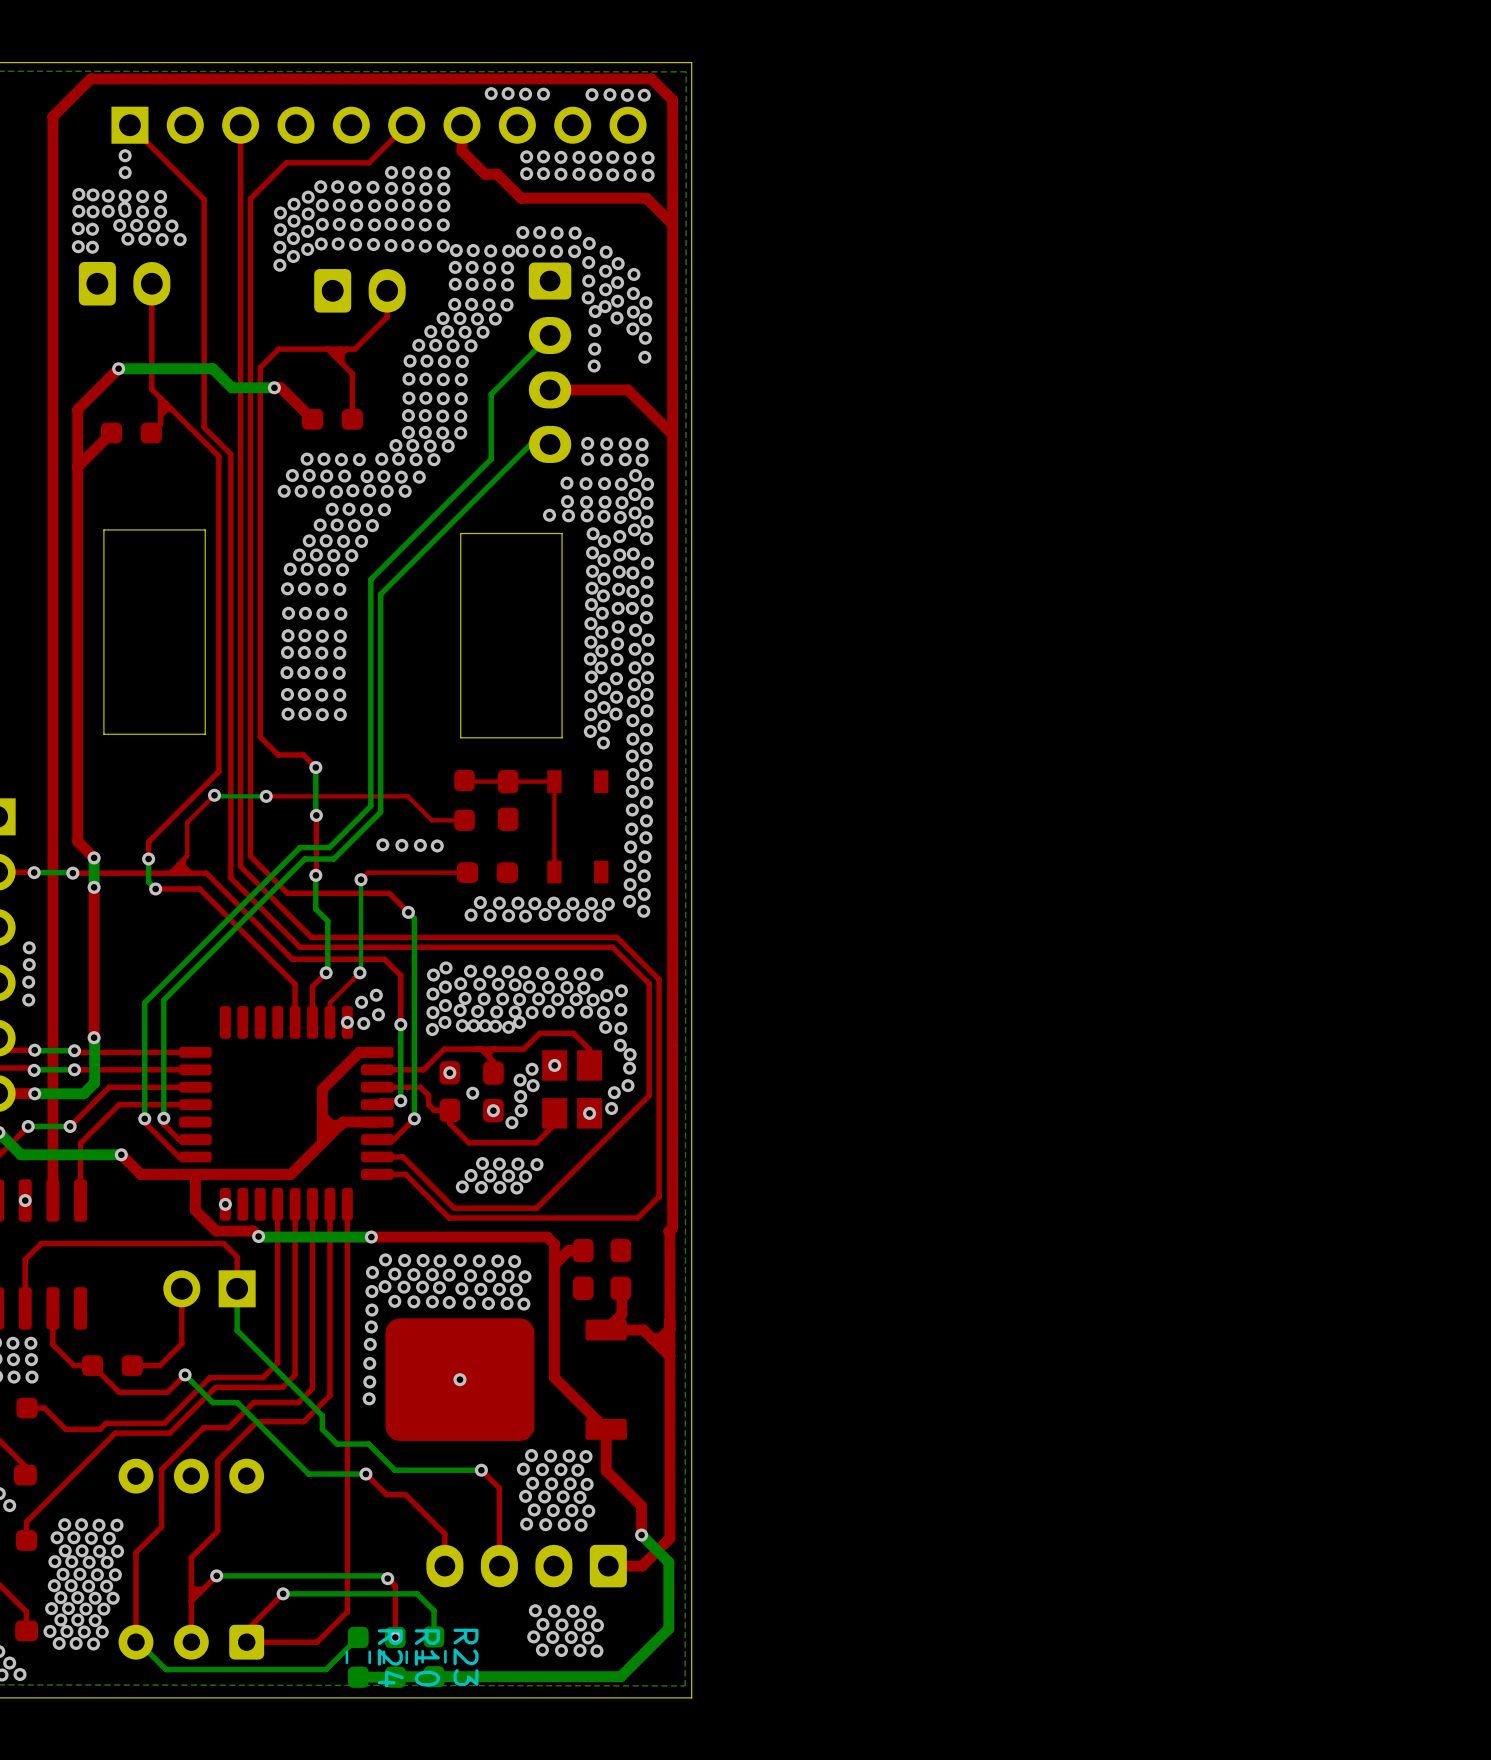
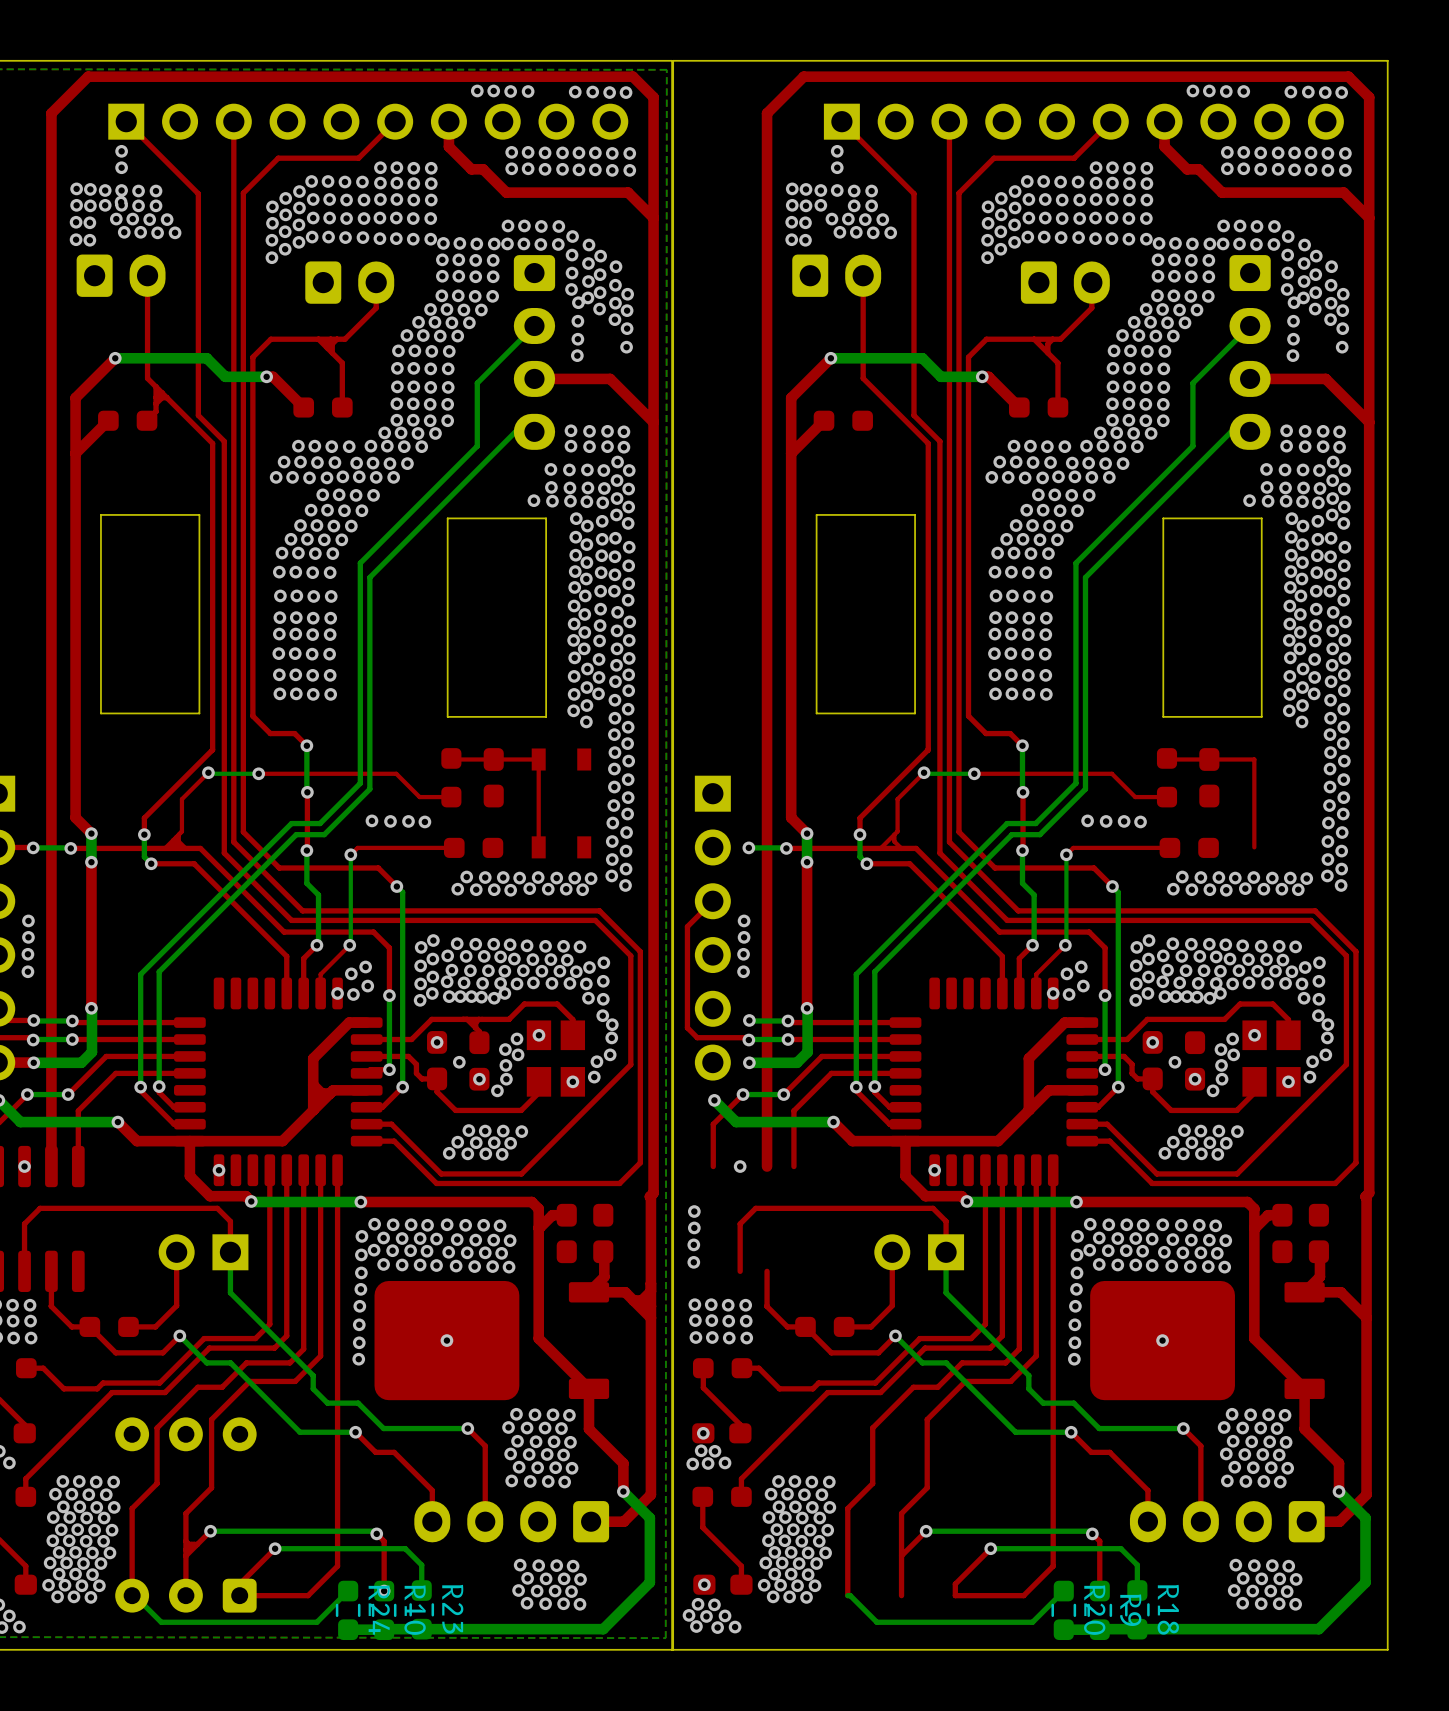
board edge: none -> (1387, 60) (673, 60) (673, 1649) (1387, 1649) (1387, 60)
via: none -> (1192, 90)
via: none -> (1209, 90)
via: none -> (1226, 91)
via: none -> (1243, 91)
via: none -> (1290, 92)
via: none -> (1308, 92)
via: none -> (1325, 92)
via: none -> (1341, 92)
top track: none -> (841, 121) (913, 193) (913, 415) (939, 441) (939, 853) (1007, 920) (1310, 920) (1346, 955) (1346, 1064) (1237, 1173) (1156, 1173) (1107, 1124) (1082, 1124)
top track: none -> (949, 121) (949, 842) (1018, 910) (1315, 910) (1355, 951) (1355, 1162) (1335, 1183) (1152, 1183) (1109, 1141) (1082, 1141)
part: none -> (1083, 121)
top track: none -> (1110, 121) (1074, 158) (993, 158) (958, 193) (958, 832) (994, 868) (1093, 868) (1112, 886)
top track: none -> (1164, 121) (1164, 146) (1187, 169) (1198, 169) (1222, 192) (1343, 192) (1369, 218)
via: none -> (837, 151)
via: none -> (1227, 152)
via: none -> (1243, 152)
via: none -> (1260, 152)
via: none -> (1278, 152)
via: none -> (1294, 152)
via: none -> (1310, 152)
via: none -> (1327, 153)
via: none -> (1345, 153)
via: none -> (837, 167)
via: none -> (1096, 167)
via: none -> (1112, 167)
via: none -> (1129, 168)
via: none -> (1146, 168)
via: none -> (1227, 168)
via: none -> (1243, 168)
via: none -> (1260, 169)
via: none -> (1278, 169)
via: none -> (1294, 169)
via: none -> (1310, 169)
via: none -> (1327, 170)
via: none -> (1345, 170)
via: none -> (1027, 181)
via: none -> (1043, 181)
via: none -> (1060, 182)
via: none -> (1078, 182)
via: none -> (1096, 183)
via: none -> (1112, 183)
via: none -> (1129, 183)
via: none -> (1146, 183)
via: none -> (792, 188)
via: none -> (806, 189)
via: none -> (820, 190)
via: none -> (837, 190)
via: none -> (854, 191)
via: none -> (871, 191)
via: none -> (1015, 191)
via: none -> (1001, 198)
via: none -> (1028, 199)
via: none -> (1045, 199)
via: none -> (1062, 200)
via: none -> (1079, 200)
via: none -> (1096, 199)
via: none -> (1112, 199)
via: none -> (1129, 200)
via: none -> (1146, 200)
via: none -> (792, 205)
via: none -> (806, 205)
via: none -> (820, 205)
via: none -> (854, 205)
via: none -> (871, 205)
via: none -> (988, 206)
via: none -> (1015, 207)
via: none -> (1001, 214)
via: none -> (1028, 218)
via: none -> (1045, 218)
via: none -> (1062, 218)
via: none -> (1079, 218)
via: none -> (1095, 218)
via: none -> (1111, 218)
via: none -> (1128, 218)
via: none -> (1146, 218)
via: none -> (831, 219)
via: none -> (848, 219)
via: none -> (865, 219)
via: none -> (882, 219)
via: none -> (791, 222)
via: none -> (805, 222)
via: none -> (988, 223)
via: none -> (1014, 224)
via: none -> (1223, 225)
via: none -> (1240, 225)
via: none -> (1256, 226)
via: none -> (1274, 226)
via: none -> (1000, 231)
via: none -> (839, 232)
via: none -> (856, 232)
via: none -> (873, 232)
via: none -> (890, 232)
via: none -> (1027, 237)
via: none -> (1044, 237)
via: none -> (1288, 236)
via: none -> (1061, 237)
via: none -> (1078, 237)
via: none -> (1095, 238)
via: none -> (1111, 238)
via: none -> (791, 239)
via: none -> (1128, 239)
via: none -> (1146, 239)
via: none -> (805, 240)
via: none -> (987, 240)
via: none -> (1014, 242)
via: none -> (1159, 243)
via: none -> (1175, 243)
via: none -> (1192, 243)
via: none -> (1209, 243)
via: none -> (1223, 243)
via: none -> (1239, 243)
via: none -> (1256, 244)
via: none -> (1273, 244)
via: none -> (1304, 245)
via: none -> (1000, 249)
via: none -> (1287, 255)
via: none -> (1316, 256)
via: none -> (987, 257)
via: none -> (1158, 259)
via: none -> (1174, 259)
via: none -> (1191, 260)
via: none -> (1208, 260)
via: none -> (1304, 263)
via: none -> (1331, 266)
via: none -> (1287, 273)
via: none -> (1315, 274)
part: none -> (836, 275)
top track: none -> (863, 275) (863, 378) (928, 443) (928, 749) (860, 818) (860, 834)
via: none -> (1158, 276)
via: none -> (1174, 276)
via: none -> (1191, 276)
via: none -> (1208, 276)
via: none -> (1304, 281)
part: none -> (1065, 282)
top track: none -> (1091, 282) (1091, 308) (1060, 339) (986, 339) (968, 357) (968, 716) (985, 733) (1010, 733) (1022, 745)
via: none -> (1331, 285)
via: none -> (1287, 289)
via: none -> (1315, 292)
via: none -> (1343, 294)
via: none -> (1157, 295)
via: none -> (1173, 295)
via: none -> (1190, 296)
via: none -> (1208, 296)
via: none -> (1303, 297)
via: none -> (1294, 302)
via: none -> (1331, 303)
via: none -> (1146, 309)
via: none -> (1162, 309)
via: none -> (1315, 309)
via: none -> (1179, 310)
via: none -> (1197, 310)
via: none -> (1342, 310)
via: none -> (1330, 319)
via: none -> (1293, 321)
via: none -> (1134, 322)
via: none -> (1150, 322)
via: none -> (1167, 322)
via: none -> (1185, 322)
bottom track: none -> (1250, 325) (1192, 383) (1192, 446) (1075, 563) (1075, 783) (1035, 823) (1007, 823) (856, 974) (856, 1087)
via: none -> (1342, 328)
via: none -> (1122, 335)
via: none -> (1138, 335)
via: none -> (1155, 336)
via: none -> (1173, 336)
top track: none -> (1034, 339) (1057, 363) (1057, 407)
top track: none -> (1052, 339) (1047, 343) (1047, 352)
via: none -> (1293, 339)
via: none -> (1342, 347)
via: none -> (1114, 350)
via: none -> (1130, 350)
via: none -> (1147, 351)
via: none -> (1164, 351)
part: none -> (1250, 352)
via: none -> (1292, 355)
top track: none -> (830, 358) (791, 397) (791, 817) (807, 833)
bottom track: none -> (830, 358) (922, 358) (940, 376) (982, 376)
via: none -> (830, 358)
via: none -> (1113, 368)
via: none -> (1129, 368)
via: none -> (1146, 368)
via: none -> (1163, 368)
top track: none -> (982, 376) (988, 376) (1019, 407)
via: none -> (982, 376)
top track: none -> (1250, 378) (1325, 378) (1369, 422)
via: none -> (1113, 386)
via: none -> (1129, 386)
via: none -> (1146, 387)
via: none -> (1163, 387)
via: none -> (1112, 403)
via: none -> (1128, 403)
via: none -> (1145, 404)
via: none -> (1163, 404)
part: none -> (1038, 407)
via: none -> (1112, 420)
via: none -> (1128, 420)
top track: none -> (824, 420) (791, 453)
part: none -> (843, 420)
via: none -> (1145, 420)
via: none -> (1163, 420)
via: none -> (1286, 430)
via: none -> (1305, 431)
via: none -> (1323, 431)
bottom track: none -> (1250, 431) (1231, 431) (1085, 577) (1085, 789) (1039, 834) (1011, 834) (874, 971) (874, 1086)
via: none -> (1339, 431)
via: none -> (1100, 432)
via: none -> (1116, 432)
via: none -> (1133, 433)
via: none -> (1151, 433)
via: none -> (1014, 446)
via: none -> (1030, 446)
via: none -> (1047, 446)
via: none -> (1064, 446)
via: none -> (1086, 446)
via: none -> (1102, 446)
via: none -> (1119, 446)
via: none -> (1137, 446)
via: none -> (1286, 446)
via: none -> (1305, 446)
via: none -> (1323, 446)
via: none -> (1339, 447)
via: none -> (999, 462)
via: none -> (1016, 462)
via: none -> (1333, 462)
via: none -> (1033, 462)
via: none -> (1050, 462)
via: none -> (1072, 463)
via: none -> (1088, 463)
via: none -> (1105, 463)
via: none -> (1123, 463)
via: none -> (1266, 469)
via: none -> (1285, 469)
via: none -> (1303, 469)
via: none -> (1319, 470)
via: none -> (1344, 470)
via: none -> (1058, 476)
via: none -> (1074, 476)
via: none -> (991, 477)
via: none -> (1008, 477)
via: none -> (1025, 477)
via: none -> (1042, 477)
via: none -> (1091, 477)
via: none -> (1109, 477)
via: none -> (1332, 480)
via: none -> (1267, 487)
via: none -> (1285, 487)
via: none -> (1303, 487)
via: none -> (1319, 488)
via: none -> (1344, 489)
via: none -> (1038, 494)
via: none -> (1054, 494)
via: none -> (1071, 495)
via: none -> (1089, 495)
via: none -> (1332, 498)
via: none -> (1249, 500)
via: none -> (1268, 501)
via: none -> (1286, 501)
via: none -> (1302, 501)
via: none -> (1318, 502)
via: none -> (1344, 507)
via: none -> (1026, 510)
via: none -> (1043, 510)
via: none -> (1060, 510)
via: none -> (1077, 510)
board edge: none -> (915, 514) (816, 514) (816, 713) (915, 713) (915, 514)
via: none -> (1332, 514)
board edge: none -> (1261, 518) (1163, 518) (1163, 716) (1261, 716) (1261, 518)
via: none -> (1291, 518)
via: none -> (1317, 521)
via: none -> (1343, 523)
via: none -> (1016, 525)
via: none -> (1032, 525)
via: none -> (1049, 526)
via: none -> (1066, 526)
via: none -> (1303, 526)
via: none -> (1291, 537)
via: none -> (1331, 538)
via: none -> (1006, 539)
via: none -> (1023, 539)
via: none -> (1039, 539)
via: none -> (1057, 539)
via: none -> (1317, 539)
via: none -> (1302, 544)
via: none -> (1344, 547)
via: none -> (997, 553)
via: none -> (1014, 553)
via: none -> (1030, 553)
via: none -> (1048, 553)
via: none -> (1291, 555)
via: none -> (1317, 555)
via: none -> (1330, 556)
via: none -> (1302, 562)
via: none -> (1344, 565)
via: none -> (994, 572)
via: none -> (1011, 572)
via: none -> (1290, 571)
via: none -> (1028, 572)
via: none -> (1045, 572)
via: none -> (1316, 572)
via: none -> (1330, 574)
via: none -> (1301, 579)
via: none -> (1344, 583)
via: none -> (1290, 587)
via: none -> (1316, 591)
via: none -> (1330, 591)
via: none -> (996, 595)
via: none -> (1012, 595)
via: none -> (1029, 596)
via: none -> (1046, 596)
via: none -> (1300, 595)
via: none -> (1343, 600)
via: none -> (1289, 606)
via: none -> (1316, 609)
via: none -> (1333, 612)
via: none -> (1300, 614)
via: none -> (995, 617)
via: none -> (1011, 617)
via: none -> (1028, 618)
via: none -> (1046, 618)
via: none -> (1345, 621)
via: none -> (1289, 623)
via: none -> (1315, 625)
via: none -> (1332, 630)
via: none -> (1300, 632)
via: none -> (994, 634)
via: none -> (1011, 634)
via: none -> (1028, 634)
via: none -> (1045, 634)
via: none -> (1289, 640)
via: none -> (1315, 640)
via: none -> (1344, 640)
via: none -> (1299, 648)
via: none -> (1332, 648)
via: none -> (994, 653)
via: none -> (1010, 653)
via: none -> (1027, 654)
via: none -> (1045, 654)
via: none -> (1290, 657)
via: none -> (1344, 658)
via: none -> (1314, 659)
via: none -> (1332, 665)
via: none -> (1303, 669)
via: none -> (994, 674)
via: none -> (1011, 674)
via: none -> (1344, 674)
via: none -> (1028, 675)
via: none -> (1045, 675)
via: none -> (1289, 676)
via: none -> (1314, 677)
via: none -> (1331, 681)
via: none -> (1302, 687)
via: none -> (1344, 690)
via: none -> (995, 693)
via: none -> (1011, 693)
via: none -> (1028, 694)
via: none -> (1046, 694)
via: none -> (1289, 694)
via: none -> (1314, 693)
via: none -> (1330, 700)
via: none -> (1302, 705)
via: none -> (1343, 709)
via: none -> (1289, 710)
via: none -> (1330, 718)
via: none -> (1302, 721)
via: none -> (1343, 727)
via: none -> (1330, 734)
via: none -> (1343, 743)
bottom track: none -> (1022, 745) (1023, 792)
via: none -> (1022, 745)
via: none -> (1330, 752)
top track: none -> (1167, 758) (1254, 759) (1254, 847)
via: none -> (1344, 761)
via: none -> (1330, 769)
top track: none -> (924, 772) (897, 799) (897, 831) (880, 848)
bottom track: none -> (924, 772) (974, 773)
via: none -> (924, 772)
top track: none -> (974, 773) (1111, 773) (1135, 797) (1167, 797)
via: none -> (974, 773)
part: none -> (1167, 777)
part: none -> (1209, 777)
via: none -> (1343, 779)
via: none -> (1330, 787)
top track: none -> (1023, 792) (1022, 850)
via: none -> (1023, 792)
via: none -> (1343, 797)
via: none -> (1329, 805)
via: none -> (1343, 814)
via: none -> (1087, 820)
via: none -> (1106, 821)
via: none -> (1124, 821)
via: none -> (1140, 821)
via: none -> (1328, 823)
via: none -> (1342, 832)
bottom track: none -> (807, 833) (807, 862)
via: none -> (807, 833)
bottom track: none -> (860, 834) (860, 856) (866, 863)
via: none -> (860, 834)
top track: none -> (894, 834) (894, 841) (901, 848)
via: none -> (1327, 841)
bottom track: none -> (748, 847) (786, 848)
via: none -> (748, 847)
top track: none -> (1169, 847) (1073, 847) (1066, 854)
part: none -> (1189, 847)
top track: none -> (786, 848) (916, 848) (999, 932) (1089, 932) (1105, 947) (1105, 995)
via: none -> (786, 848)
bottom track: none -> (1022, 850) (1022, 883) (1034, 895) (1034, 943) (1032, 945)
via: none -> (1022, 850)
via: none -> (1341, 851)
bottom track: none -> (1066, 854) (1065, 945)
via: none -> (1066, 854)
via: none -> (1327, 859)
top track: none -> (807, 862) (807, 1008)
via: none -> (807, 862)
top track: none -> (866, 863) (909, 863) (1002, 956) (1002, 993)
via: none -> (866, 863)
via: none -> (1341, 869)
via: none -> (1327, 875)
via: none -> (1182, 877)
via: none -> (1200, 877)
via: none -> (1218, 877)
via: none -> (1235, 878)
via: none -> (1253, 877)
via: none -> (1272, 878)
via: none -> (1290, 878)
via: none -> (1306, 878)
via: none -> (1341, 885)
bottom track: none -> (1112, 886) (1118, 892) (1118, 1087)
via: none -> (1112, 886)
via: none -> (1245, 888)
via: none -> (1173, 889)
via: none -> (1191, 889)
via: none -> (1209, 889)
via: none -> (1263, 889)
via: none -> (1281, 889)
via: none -> (1298, 889)
via: none -> (1226, 890)
top track: none -> (712, 901) (687, 926) (687, 1027) (697, 1037) (746, 1037) (748, 1040)
via: none -> (744, 920)
part: none -> (712, 928)
via: none -> (744, 937)
via: none -> (1149, 940)
via: none -> (1172, 943)
via: none -> (1191, 944)
via: none -> (1209, 944)
top track: none -> (1032, 945) (1019, 958) (1019, 993)
via: none -> (1032, 945)
top track: none -> (1065, 945) (1036, 974) (1036, 993)
via: none -> (1065, 945)
via: none -> (1225, 944)
via: none -> (1242, 945)
via: none -> (1261, 946)
via: none -> (1279, 946)
via: none -> (1295, 946)
via: none -> (1136, 947)
via: none -> (743, 954)
via: none -> (1163, 955)
via: none -> (1181, 956)
via: none -> (1199, 956)
via: none -> (1216, 956)
via: none -> (1148, 959)
via: none -> (1229, 959)
via: none -> (1248, 959)
via: none -> (1266, 959)
via: none -> (1282, 960)
via: none -> (1319, 962)
via: none -> (1136, 965)
via: none -> (1081, 966)
via: none -> (1305, 967)
via: none -> (1167, 970)
via: none -> (1186, 970)
via: none -> (1204, 970)
via: none -> (1220, 971)
via: none -> (1238, 970)
via: none -> (1257, 971)
via: none -> (1275, 971)
via: none -> (743, 971)
via: none -> (1291, 971)
via: none -> (1066, 973)
via: none -> (1148, 977)
via: none -> (1318, 981)
via: none -> (1162, 981)
via: none -> (1179, 982)
via: none -> (1249, 982)
via: none -> (1136, 983)
via: none -> (1198, 983)
via: none -> (1216, 983)
via: none -> (1232, 983)
via: none -> (1267, 983)
via: none -> (1285, 983)
via: none -> (1301, 983)
via: none -> (1083, 986)
via: none -> (1053, 993)
via: none -> (1147, 993)
via: none -> (1220, 993)
via: none -> (1069, 994)
bottom track: none -> (1105, 995) (1105, 1069)
via: none -> (1105, 995)
via: none -> (1164, 996)
via: none -> (1176, 996)
via: none -> (1187, 996)
via: none -> (1197, 997)
via: none -> (1209, 998)
via: none -> (1304, 998)
via: none -> (1318, 999)
via: none -> (1135, 1000)
bottom track: none -> (807, 1008) (807, 1052) (797, 1062) (749, 1062)
via: none -> (807, 1008)
via: none -> (1318, 1015)
bottom track: none -> (749, 1020) (788, 1020)
via: none -> (749, 1020)
top track: none -> (788, 1020) (789, 1022) (905, 1022)
via: none -> (788, 1020)
top track: none -> (1082, 1022) (1064, 1022) (1028, 1058) (1029, 1109)
via: none -> (1327, 1024)
via: none -> (1254, 1035)
top track: none -> (1288, 1035) (1288, 1019) (1272, 1004) (1240, 1004) (1224, 1019) (1147, 1019) (1127, 1039) (1082, 1039)
via: none -> (1327, 1037)
bottom track: none -> (788, 1039) (748, 1040)
via: none -> (788, 1039)
top track: none -> (905, 1039) (788, 1039)
via: none -> (1232, 1038)
via: none -> (748, 1040)
via: none -> (1152, 1042)
via: none -> (1220, 1049)
via: none -> (1233, 1054)
via: none -> (1325, 1054)
top track: none -> (905, 1056) (821, 1056) (783, 1094)
top track: none -> (1082, 1056) (1124, 1056) (1132, 1064) (1132, 1073) (1137, 1078) (1152, 1078) (1152, 1091) (1171, 1110) (1236, 1110) (1254, 1092) (1254, 1081)
part: none -> (1271, 1058)
part: none -> (1152, 1060)
part: none -> (1195, 1060)
via: none -> (1312, 1061)
via: none -> (749, 1062)
via: none -> (1174, 1062)
via: none -> (1221, 1065)
via: none -> (1105, 1069)
top track: none -> (905, 1073) (831, 1073) (793, 1110) (793, 1166)
via: none -> (1309, 1077)
via: none -> (1195, 1079)
via: none -> (1222, 1079)
part: none -> (993, 1081)
via: none -> (1288, 1081)
top track: none -> (856, 1087) (856, 1090) (889, 1124) (905, 1124)
via: none -> (856, 1087)
top track: none -> (874, 1086) (874, 1092) (889, 1107) (905, 1107)
via: none -> (874, 1086)
top track: none -> (1118, 1087) (1098, 1107) (1082, 1107)
via: none -> (1118, 1087)
top track: none -> (1082, 1090) (1048, 1090) (998, 1141) (852, 1141) (833, 1122)
via: none -> (1213, 1090)
top track: none -> (743, 1094) (713, 1124) (713, 1166)
via: none -> (743, 1094)
bottom track: none -> (783, 1094) (743, 1094)
via: none -> (783, 1094)
bottom track: none -> (714, 1100) (736, 1122) (833, 1122)
via: none -> (714, 1100)
via: none -> (833, 1122)
via: none -> (1184, 1130)
via: none -> (1200, 1131)
via: none -> (1218, 1131)
via: none -> (1237, 1131)
top track: none -> (905, 1141) (905, 1176) (925, 1196) (961, 1196) (966, 1201)
via: none -> (1173, 1142)
via: none -> (1191, 1142)
via: none -> (1209, 1142)
via: none -> (1226, 1143)
via: none -> (1164, 1153)
via: none -> (1183, 1153)
via: none -> (1201, 1153)
via: none -> (1217, 1154)
via: none -> (740, 1166)
top track: none -> (767, 1166) (767, 113) (803, 76) (1348, 76) (1369, 97) (1369, 1193) (1365, 1196) (1366, 1494) (1339, 1521) (1306, 1521)
via: none -> (934, 1170)
top track: none -> (985, 1170) (985, 1324) (971, 1338) (919, 1338) (875, 1383) (818, 1383) (812, 1388) (779, 1388) (758, 1368) (741, 1368)
top track: none -> (1002, 1170) (1002, 1335) (990, 1348) (925, 1348) (880, 1392) (827, 1392) (741, 1478) (741, 1496)
top track: none -> (1019, 1170) (1019, 1349) (1005, 1362) (962, 1362) (937, 1387) (913, 1387) (872, 1428) (872, 1483) (847, 1508) (847, 1595)
top track: none -> (1036, 1170) (1036, 1356) (1010, 1381) (965, 1381) (927, 1419) (927, 1487) (901, 1513) (901, 1595)
top track: none -> (1053, 1170) (1053, 1566) (1023, 1595) (955, 1595) (955, 1584) (990, 1548)
bottom track: none -> (966, 1201) (1076, 1202)
via: none -> (966, 1201)
top track: none -> (1076, 1202) (1247, 1202) (1254, 1208) (1254, 1338) (1304, 1388) (1304, 1429) (1339, 1463) (1339, 1491)
via: none -> (1076, 1202)
via: none -> (694, 1211)
top track: none -> (1282, 1215) (1268, 1215) (1254, 1227)
via: none -> (1090, 1224)
via: none -> (1108, 1224)
via: none -> (1126, 1224)
via: none -> (1162, 1224)
via: none -> (1143, 1225)
via: none -> (1181, 1225)
via: none -> (1199, 1225)
via: none -> (1215, 1225)
via: none -> (694, 1227)
part: none -> (1282, 1233)
part: none -> (1318, 1233)
via: none -> (1077, 1236)
via: none -> (1099, 1237)
via: none -> (1117, 1238)
via: none -> (1135, 1238)
via: none -> (1152, 1239)
via: none -> (1172, 1239)
via: none -> (1191, 1240)
via: none -> (1209, 1240)
via: none -> (1225, 1240)
via: none -> (693, 1244)
via: none -> (1089, 1250)
via: none -> (1108, 1250)
via: none -> (1126, 1250)
via: none -> (1142, 1251)
top track: none -> (892, 1252) (892, 1305) (871, 1326) (844, 1326)
part: none -> (919, 1252)
top track: none -> (946, 1252) (946, 1221) (933, 1208) (755, 1208) (740, 1223) (740, 1271)
bottom track: none -> (946, 1252) (946, 1292) (1028, 1375) (1028, 1388) (1043, 1403) (1073, 1403) (1099, 1428) (1183, 1428)
via: none -> (1164, 1252)
top track: none -> (1318, 1251) (1319, 1276) (1304, 1292) (1340, 1292) (1366, 1317)
via: none -> (1182, 1252)
via: none -> (1200, 1252)
via: none -> (1217, 1253)
via: none -> (1077, 1254)
via: none -> (693, 1262)
via: none -> (1099, 1264)
via: none -> (1117, 1264)
via: none -> (1135, 1264)
via: none -> (1152, 1265)
via: none -> (1171, 1266)
via: none -> (1190, 1266)
via: none -> (1208, 1266)
via: none -> (1224, 1267)
top track: none -> (767, 1271) (767, 1306)
via: none -> (1077, 1272)
via: none -> (1076, 1289)
via: none -> (694, 1304)
via: none -> (711, 1304)
via: none -> (728, 1305)
via: none -> (745, 1305)
top track: none -> (766, 1306) (787, 1326) (805, 1326) (831, 1352) (878, 1352) (895, 1335)
via: none -> (1075, 1306)
via: none -> (695, 1320)
via: none -> (711, 1320)
via: none -> (728, 1321)
via: none -> (746, 1321)
via: none -> (1074, 1324)
part: none -> (824, 1326)
bottom track: none -> (895, 1335) (922, 1362) (946, 1362) (1015, 1432) (1071, 1432)
via: none -> (895, 1335)
via: none -> (695, 1337)
via: none -> (712, 1337)
via: none -> (729, 1338)
via: none -> (746, 1338)
via: none -> (1162, 1340)
part: none -> (1207, 1340)
via: none -> (1074, 1342)
via: none -> (1074, 1359)
top track: none -> (703, 1368) (703, 1387) (740, 1424) (740, 1433)
part: none -> (722, 1368)
via: none -> (1232, 1414)
via: none -> (1250, 1414)
via: none -> (1268, 1414)
via: none -> (1285, 1415)
via: none -> (1224, 1427)
via: none -> (1242, 1428)
via: none -> (1260, 1428)
top track: none -> (1183, 1428) (1200, 1446) (1200, 1521)
via: none -> (1183, 1428)
via: none -> (1277, 1428)
top track: none -> (1071, 1432) (1091, 1452) (1109, 1452) (1147, 1490) (1147, 1521)
via: none -> (1071, 1432)
via: none -> (703, 1433)
part: none -> (721, 1433)
via: none -> (1233, 1441)
via: none -> (1251, 1441)
via: none -> (1269, 1441)
via: none -> (1286, 1442)
via: none -> (701, 1450)
via: none -> (714, 1451)
via: none -> (1226, 1453)
via: none -> (1244, 1454)
via: none -> (1262, 1454)
via: none -> (1279, 1455)
via: none -> (725, 1462)
via: none -> (692, 1464)
via: none -> (708, 1463)
via: none -> (1234, 1467)
via: none -> (1253, 1467)
via: none -> (1271, 1467)
via: none -> (1287, 1468)
via: none -> (778, 1481)
via: none -> (794, 1481)
via: none -> (1227, 1480)
via: none -> (1245, 1481)
via: none -> (1263, 1481)
via: none -> (811, 1482)
via: none -> (829, 1482)
via: none -> (1280, 1482)
bottom track: none -> (1339, 1491) (1365, 1518) (1365, 1582) (1318, 1629) (1063, 1629)
via: none -> (1339, 1491)
via: none -> (771, 1494)
via: none -> (787, 1494)
via: none -> (804, 1494)
via: none -> (821, 1494)
top track: none -> (702, 1496) (702, 1527) (741, 1566) (741, 1584)
part: none -> (722, 1496)
via: none -> (779, 1506)
via: none -> (795, 1506)
via: none -> (812, 1507)
via: none -> (829, 1507)
via: none -> (768, 1517)
via: none -> (785, 1517)
via: none -> (802, 1518)
via: none -> (819, 1518)
part: none -> (1227, 1521)
via: none -> (776, 1529)
via: none -> (793, 1529)
via: none -> (810, 1530)
via: none -> (827, 1530)
top track: none -> (926, 1531) (901, 1555)
bottom track: none -> (926, 1531) (1089, 1531) (1092, 1533)
via: none -> (926, 1531)
top track: none -> (1092, 1533) (1099, 1541) (1099, 1591)
via: none -> (1092, 1533)
via: none -> (768, 1540)
via: none -> (784, 1540)
via: none -> (801, 1541)
via: none -> (819, 1541)
bottom track: none -> (990, 1548) (1120, 1548) (1137, 1565) (1137, 1590)
via: none -> (990, 1548)
via: none -> (774, 1552)
via: none -> (791, 1552)
via: none -> (808, 1552)
via: none -> (825, 1552)
via: none -> (765, 1562)
via: none -> (782, 1562)
via: none -> (799, 1563)
via: none -> (816, 1563)
via: none -> (1235, 1565)
via: none -> (1254, 1565)
via: none -> (1272, 1565)
via: none -> (1288, 1566)
via: none -> (774, 1574)
via: none -> (791, 1574)
via: none -> (808, 1574)
via: none -> (1243, 1578)
via: none -> (1261, 1578)
via: none -> (1279, 1578)
via: none -> (1296, 1579)
via: none -> (704, 1584)
part: none -> (722, 1584)
via: none -> (764, 1585)
via: none -> (780, 1585)
via: none -> (797, 1585)
via: none -> (815, 1585)
via: none -> (1234, 1590)
bottom track: none -> (1063, 1591) (1032, 1622) (876, 1622) (850, 1595) (847, 1595)
via: none -> (1252, 1591)
via: none -> (1270, 1591)
via: none -> (1287, 1591)
via: none -> (773, 1596)
via: none -> (789, 1596)
via: none -> (806, 1597)
via: none -> (1242, 1603)
via: none -> (1261, 1603)
via: none -> (1279, 1603)
via: none -> (698, 1604)
via: none -> (714, 1604)
via: none -> (1295, 1604)
R18: none -> (1137, 1609)
R20: none -> (1063, 1610)
R9: none -> (1099, 1610)
via: none -> (689, 1615)
via: none -> (706, 1616)
via: none -> (725, 1615)
via: none -> (696, 1626)
via: none -> (735, 1627)
via: none -> (717, 1627)

